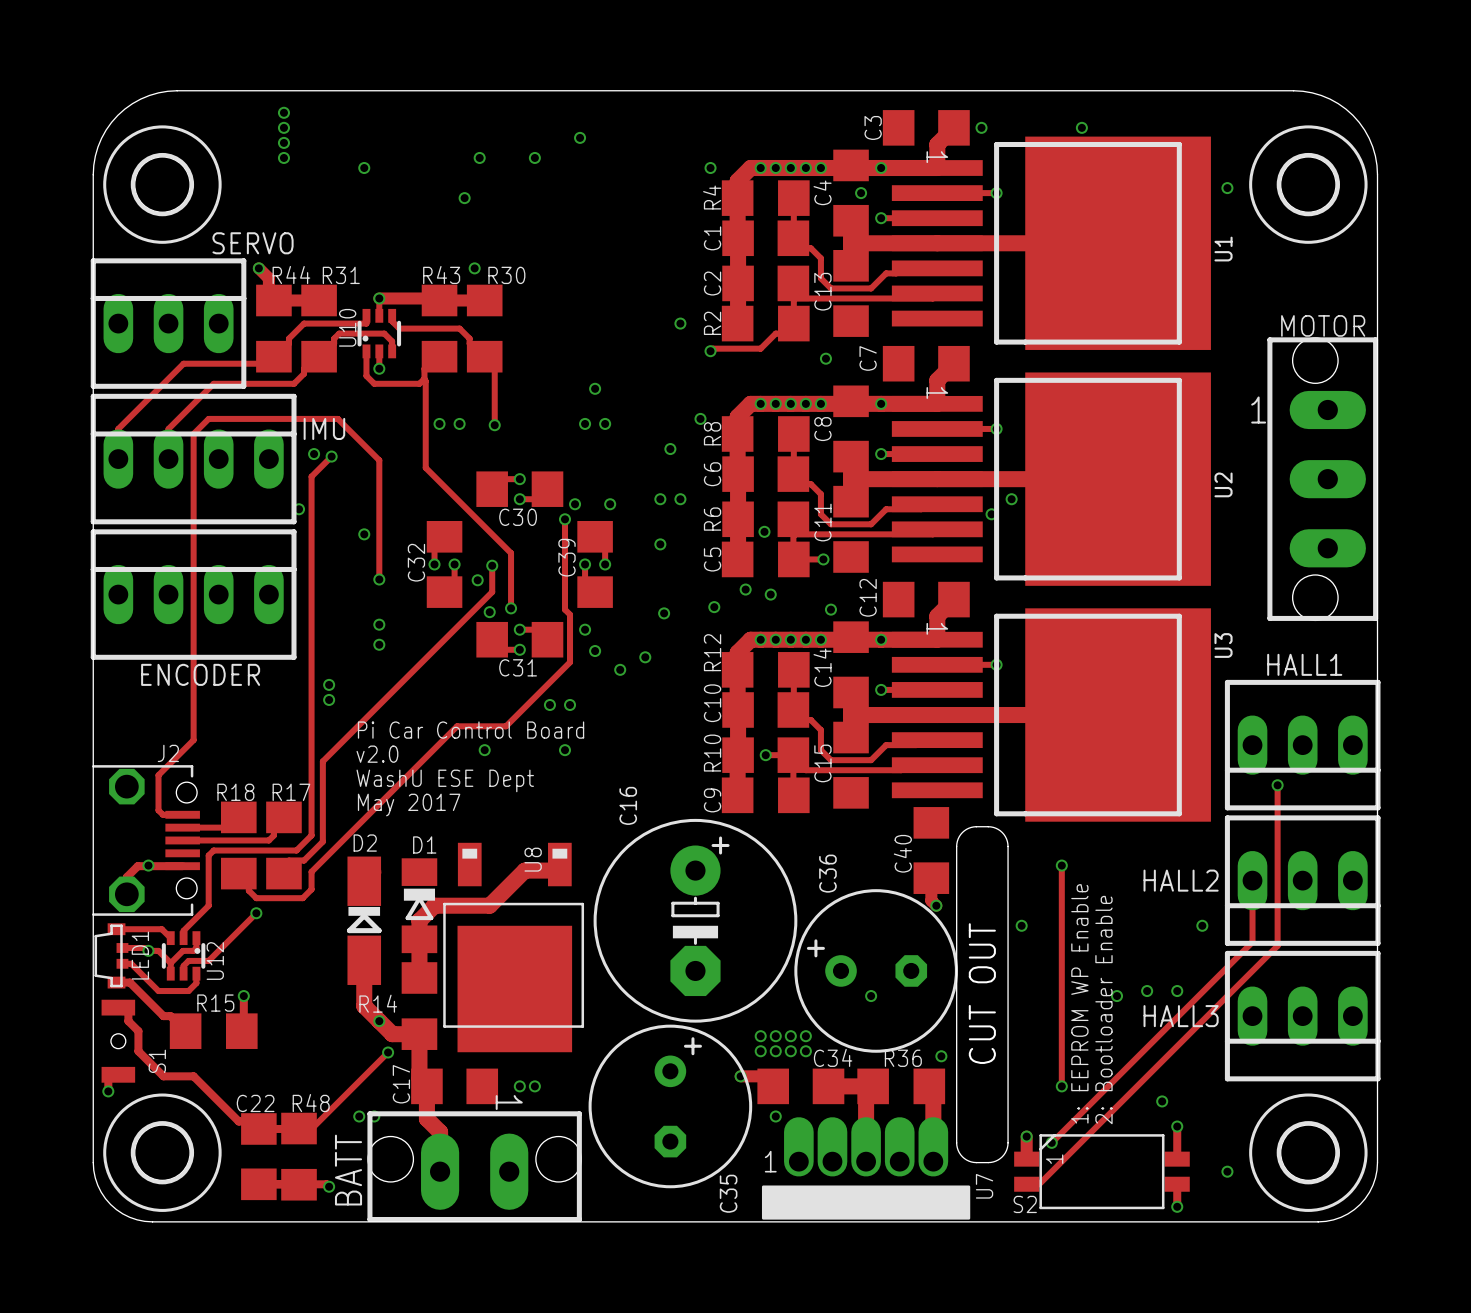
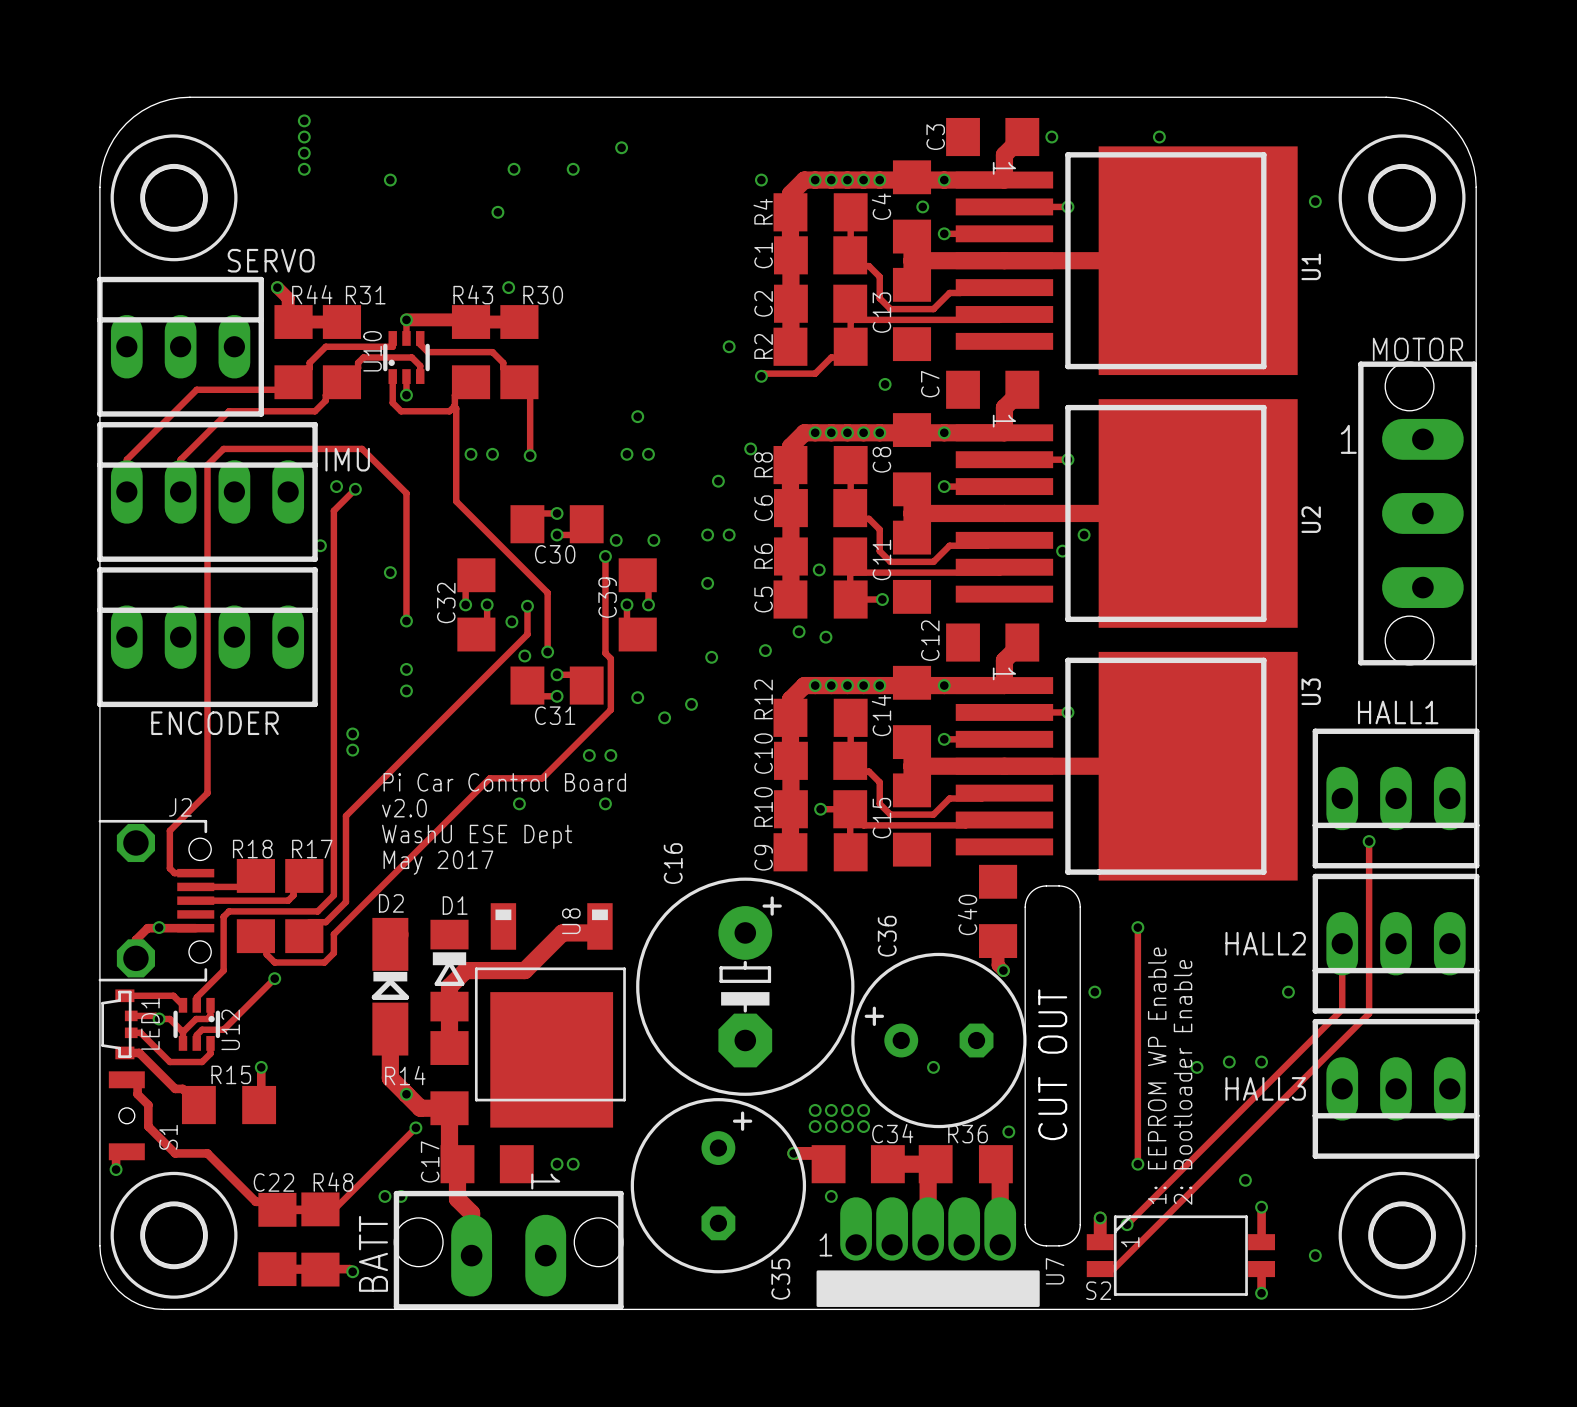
via: (830, 609) -> none
via: (585, 629) -> none

